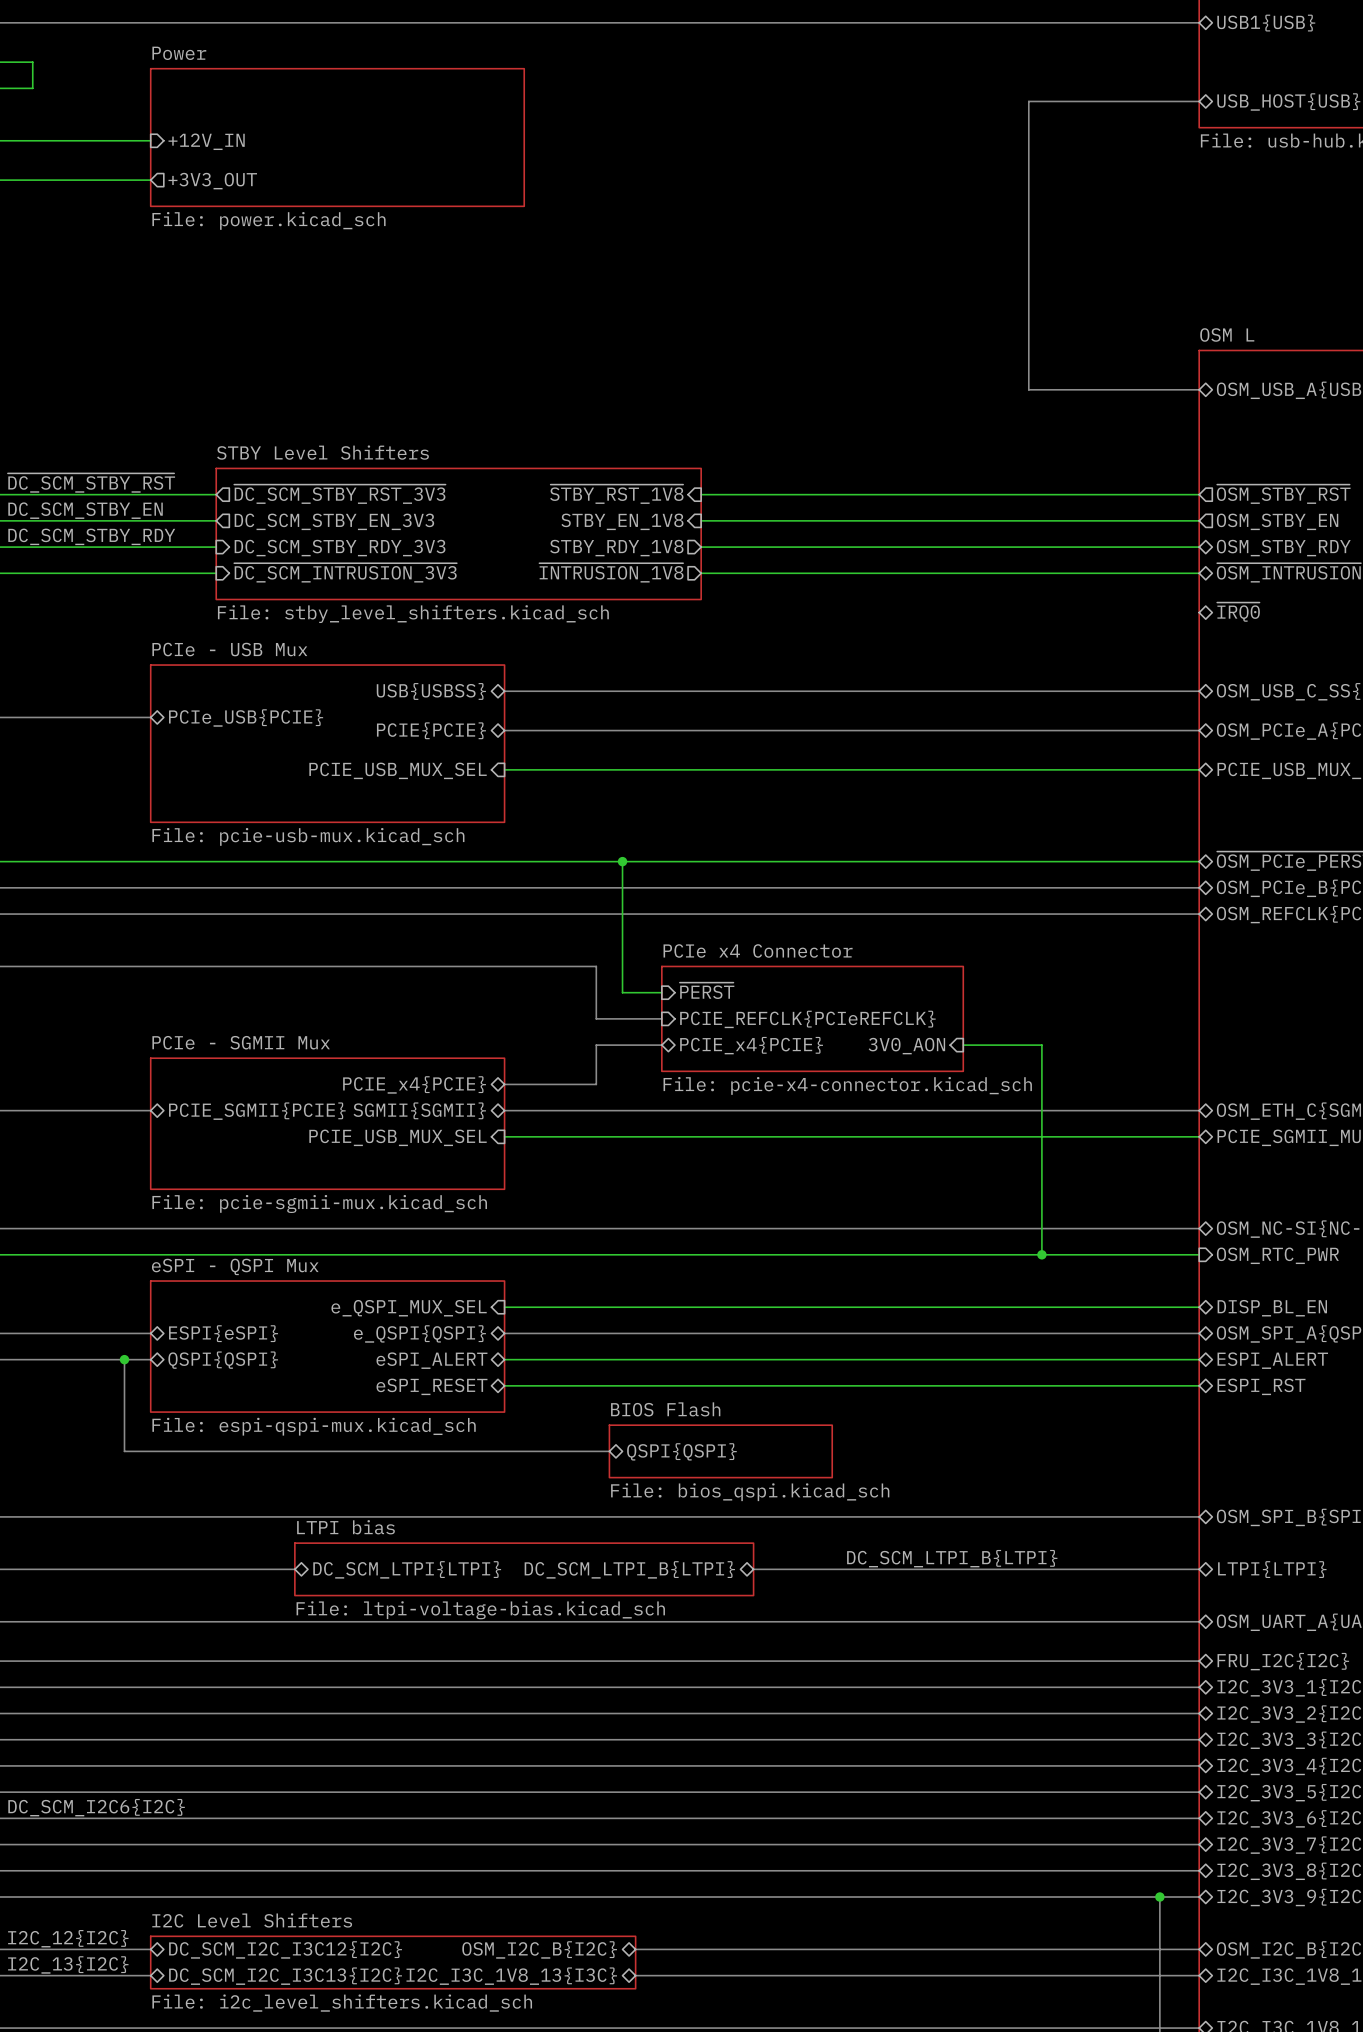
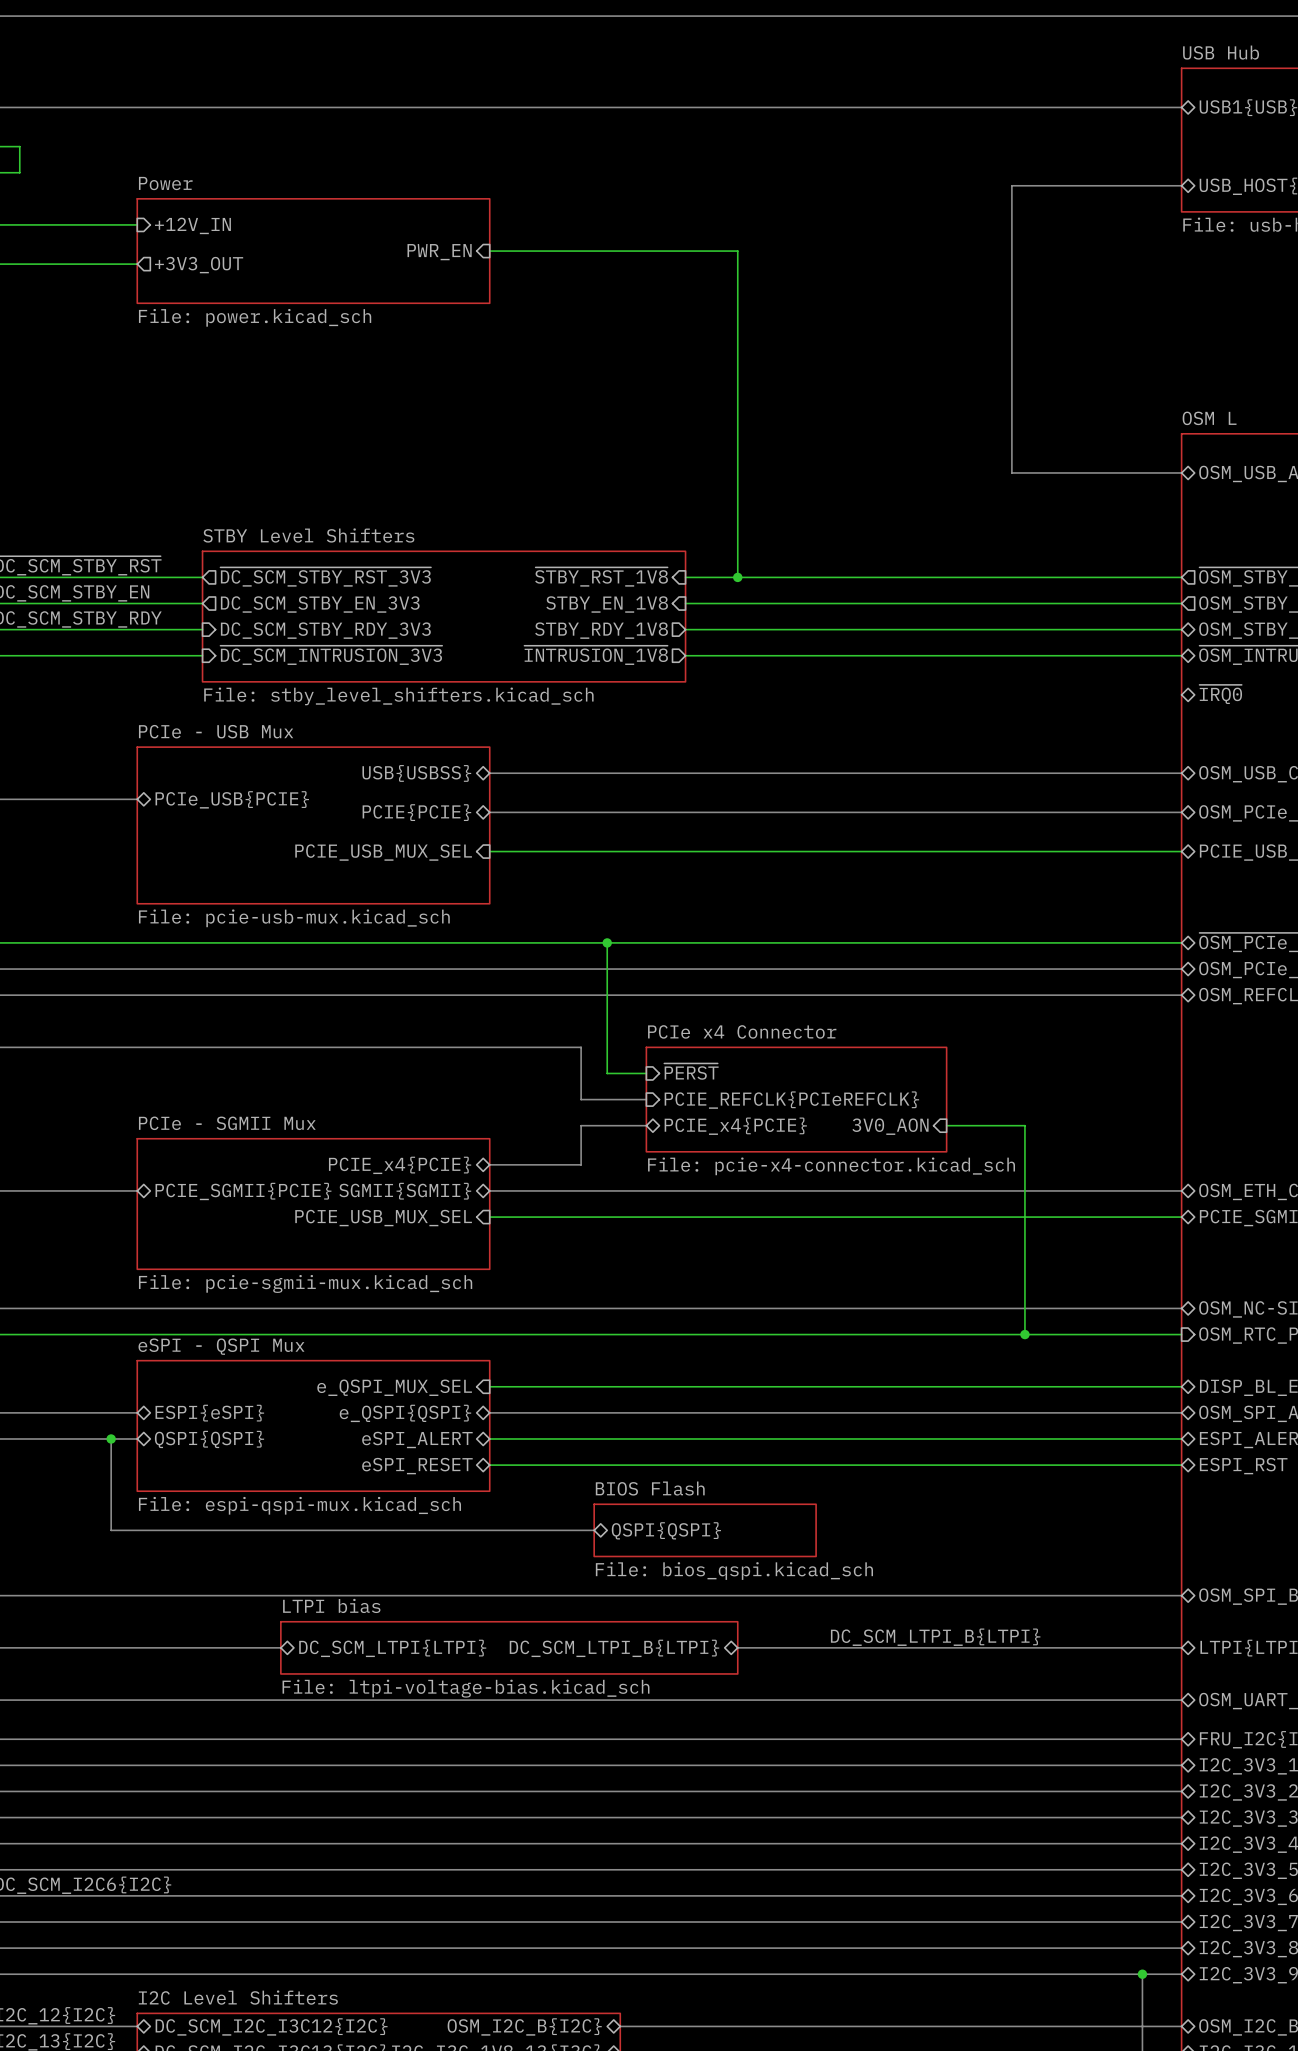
sheet Power: File: power.kicad_sch (337, 137) -> none
sheet Power: none -> File: power.kicad_sch (313, 251)
wire: none -> (489, 251) (737, 251) (737, 577)
sheet pin: none -> PWR_EN (439, 252)
junction: none -> (737, 577)

